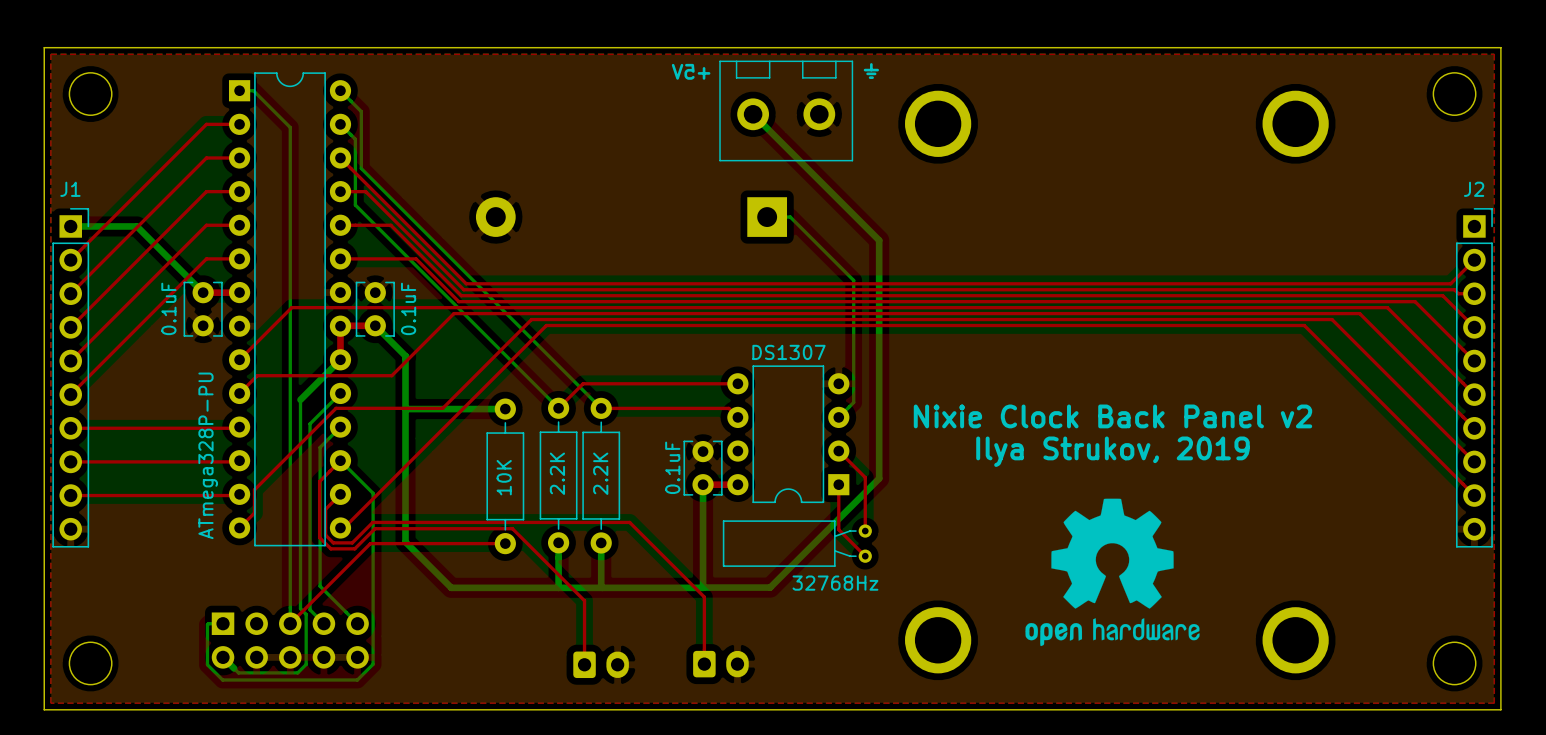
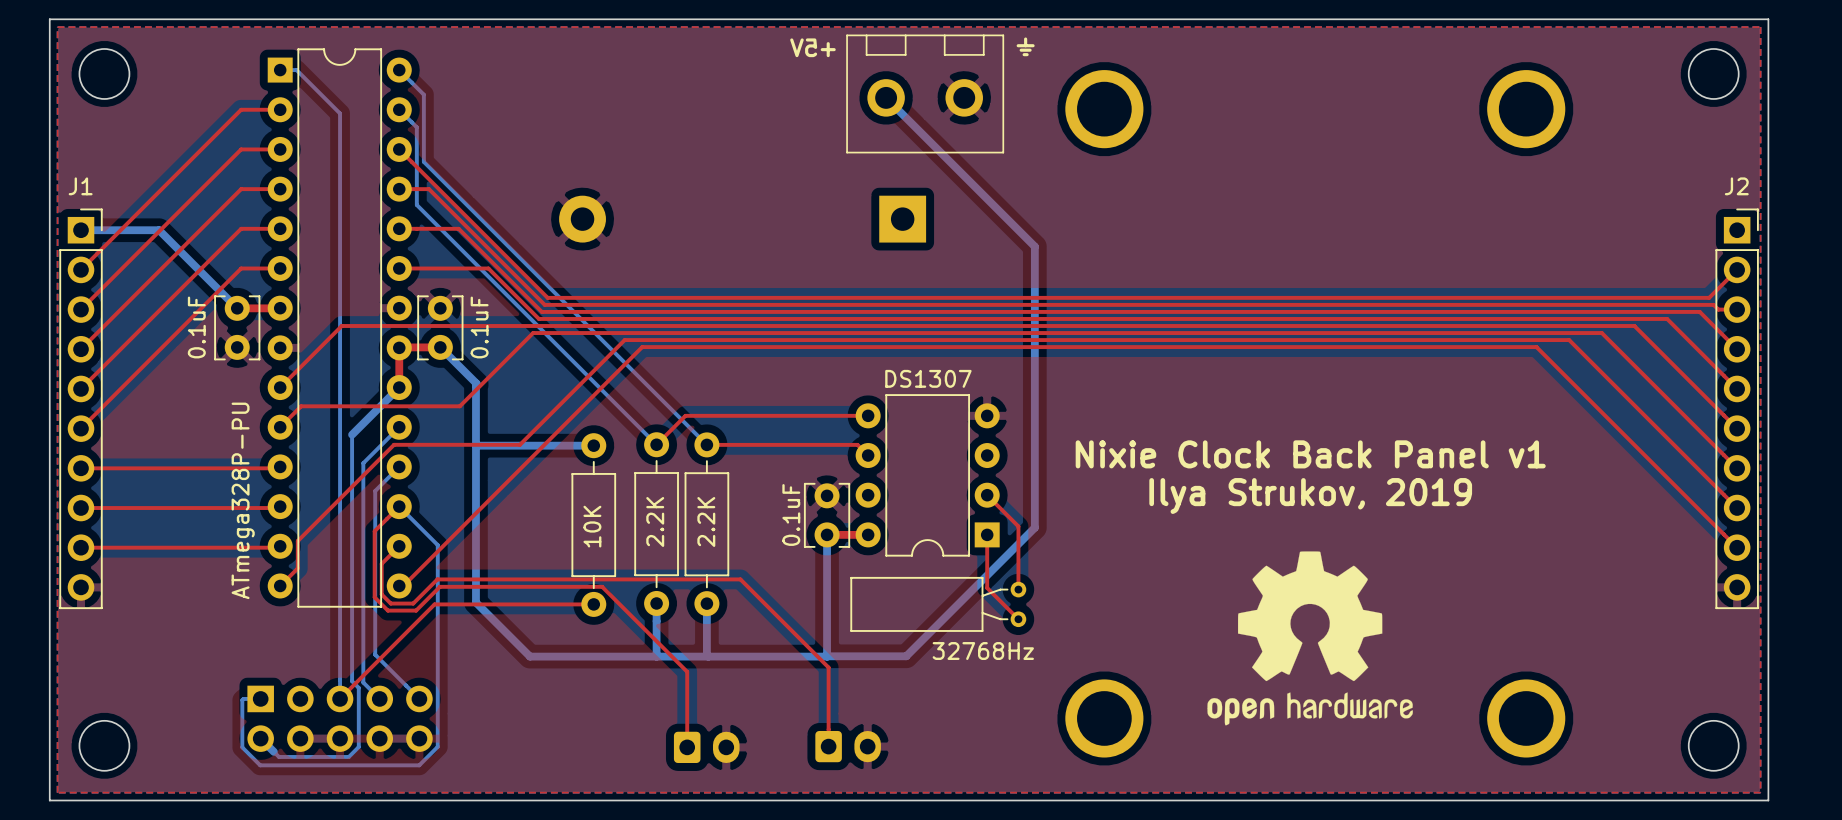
bottom track: (767, 217) (790, 217) (853, 280) (853, 402) (838, 417) -> none
text: Nixie Clock Back Panel v2 (1112, 416) -> Nixie Clock Back Panel v1 (1310, 454)

